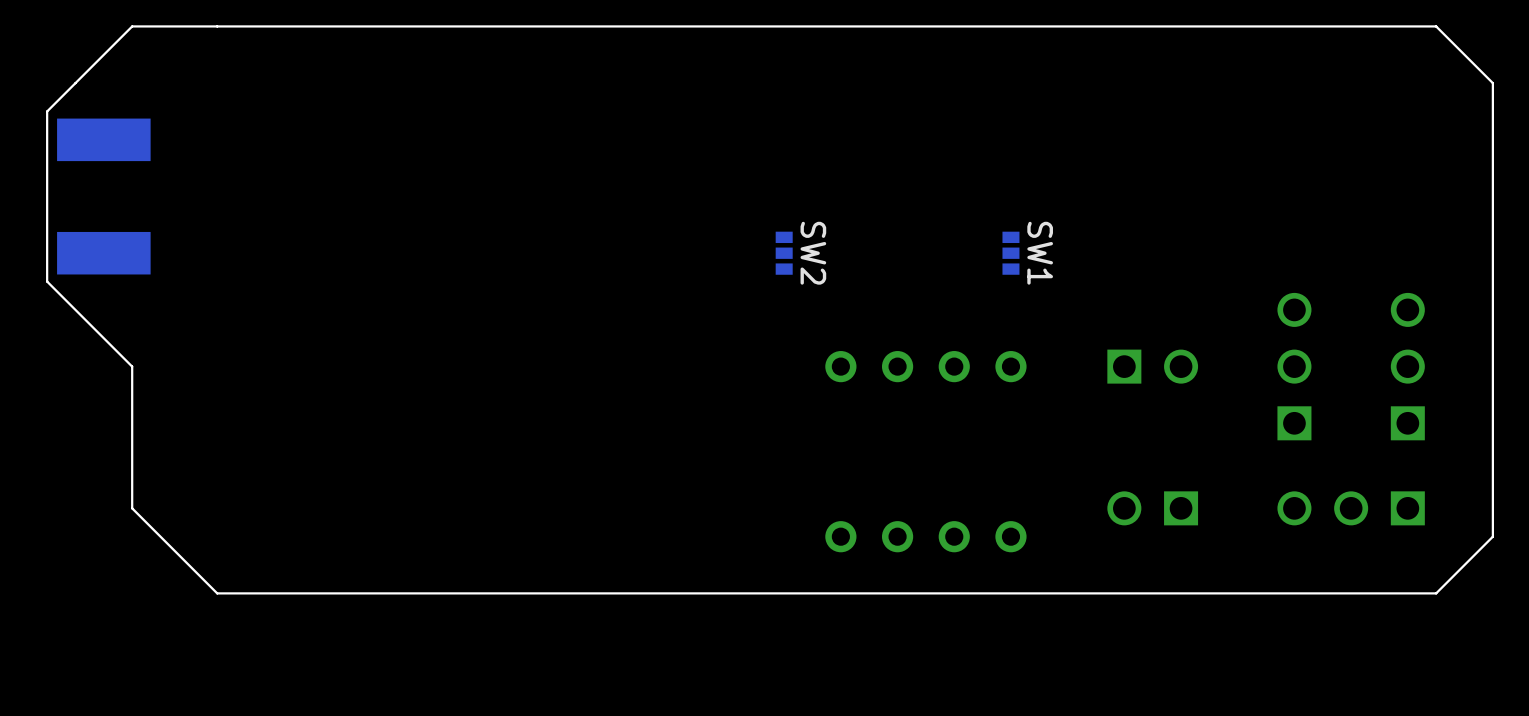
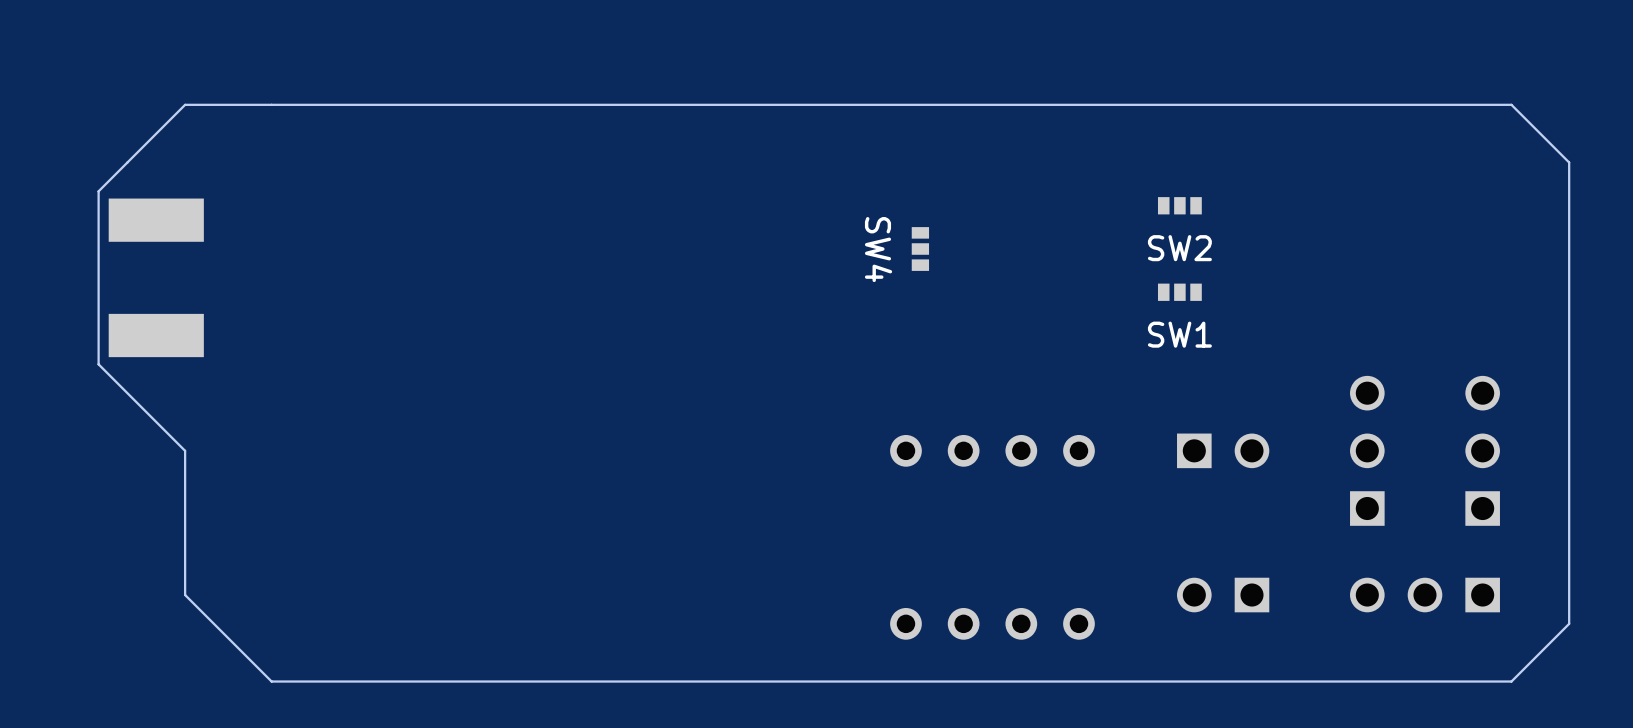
SW4: none -> (920, 249)
SW2 rotation: 0° (784, 253) -> 90° clockwise (1179, 205)
SW2 position: (784, 253) -> (1179, 205)
SW1 rotation: 0° (1010, 253) -> 90° clockwise (1179, 292)
SW1 position: (1010, 253) -> (1179, 292)

